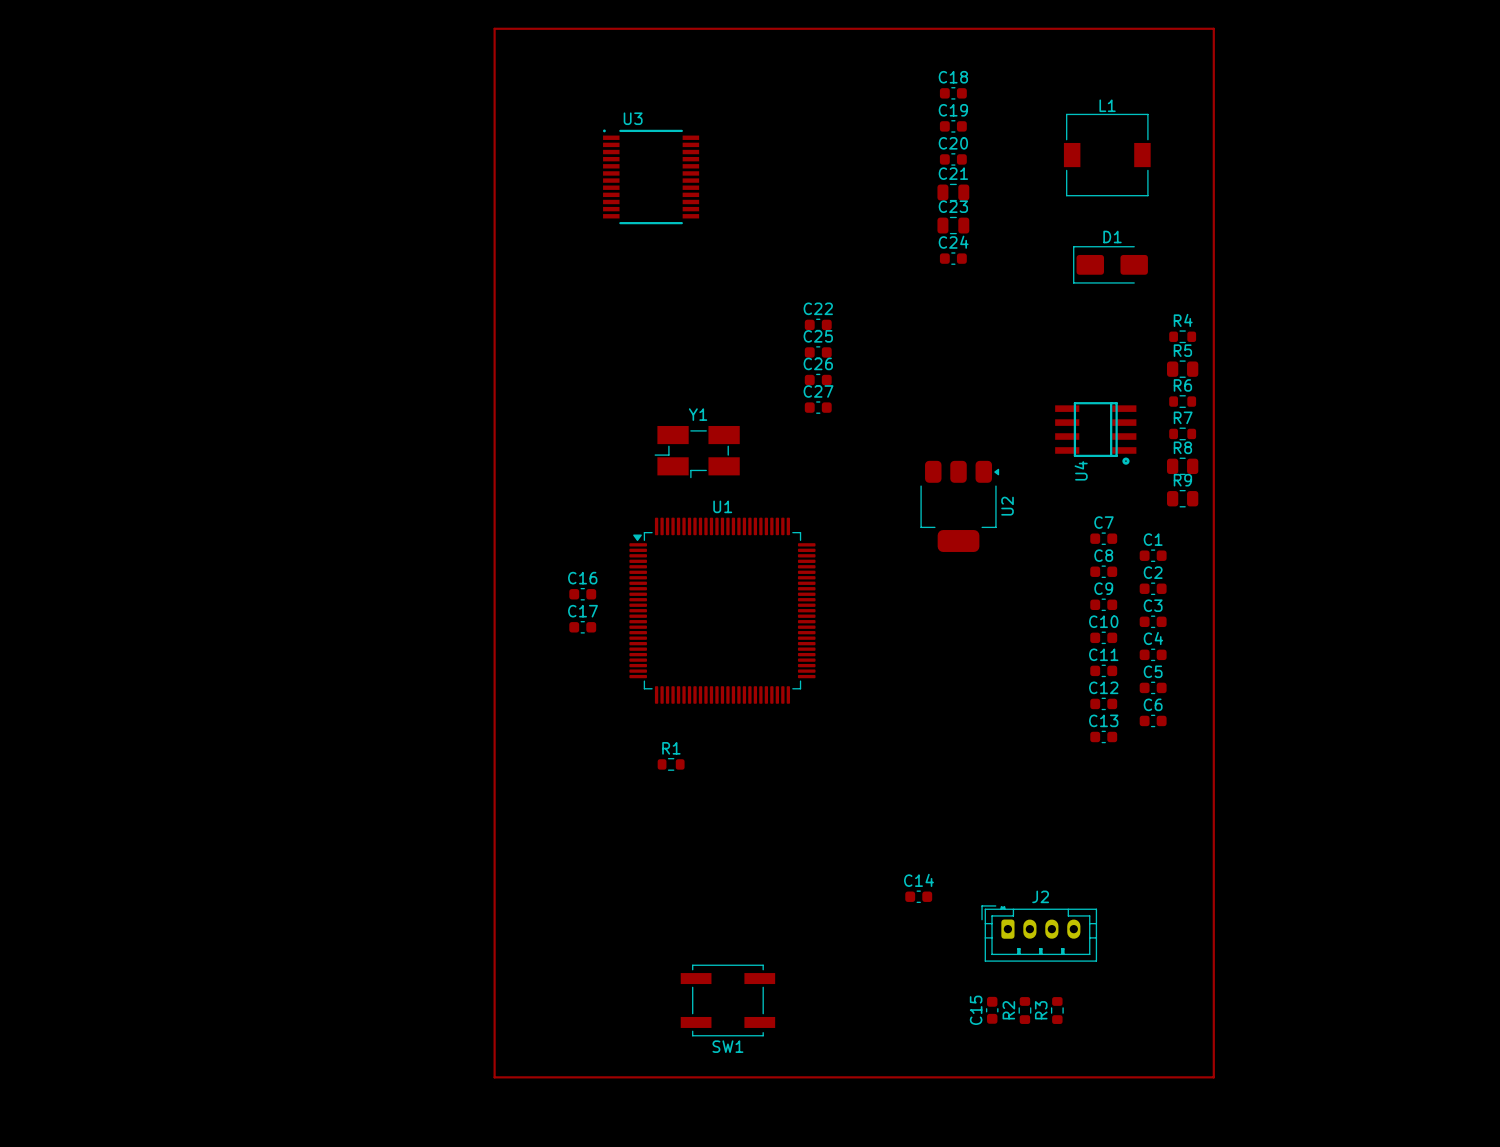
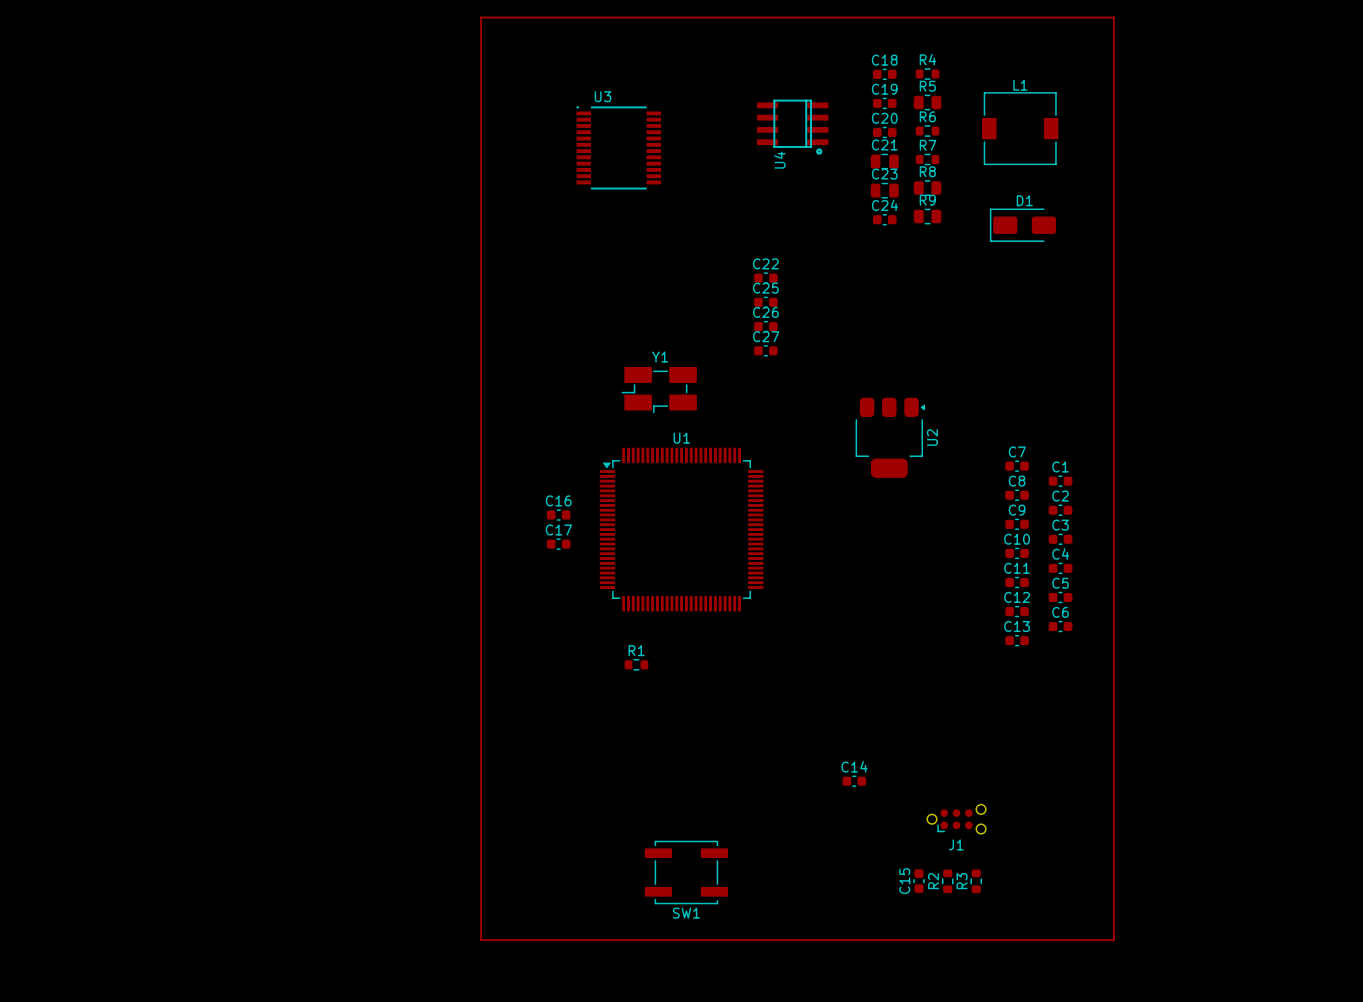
R4 position: (1182, 336) -> (927, 74)
R5 position: (1182, 369) -> (927, 102)
R6 position: (1182, 401) -> (927, 131)
U4 position: (1095, 433) -> (792, 127)
R7 position: (1182, 433) -> (927, 159)
R8 position: (1182, 466) -> (927, 188)
R9 position: (1182, 498) -> (927, 216)
J2: (1039, 933) -> none
J1: none -> (956, 819)

